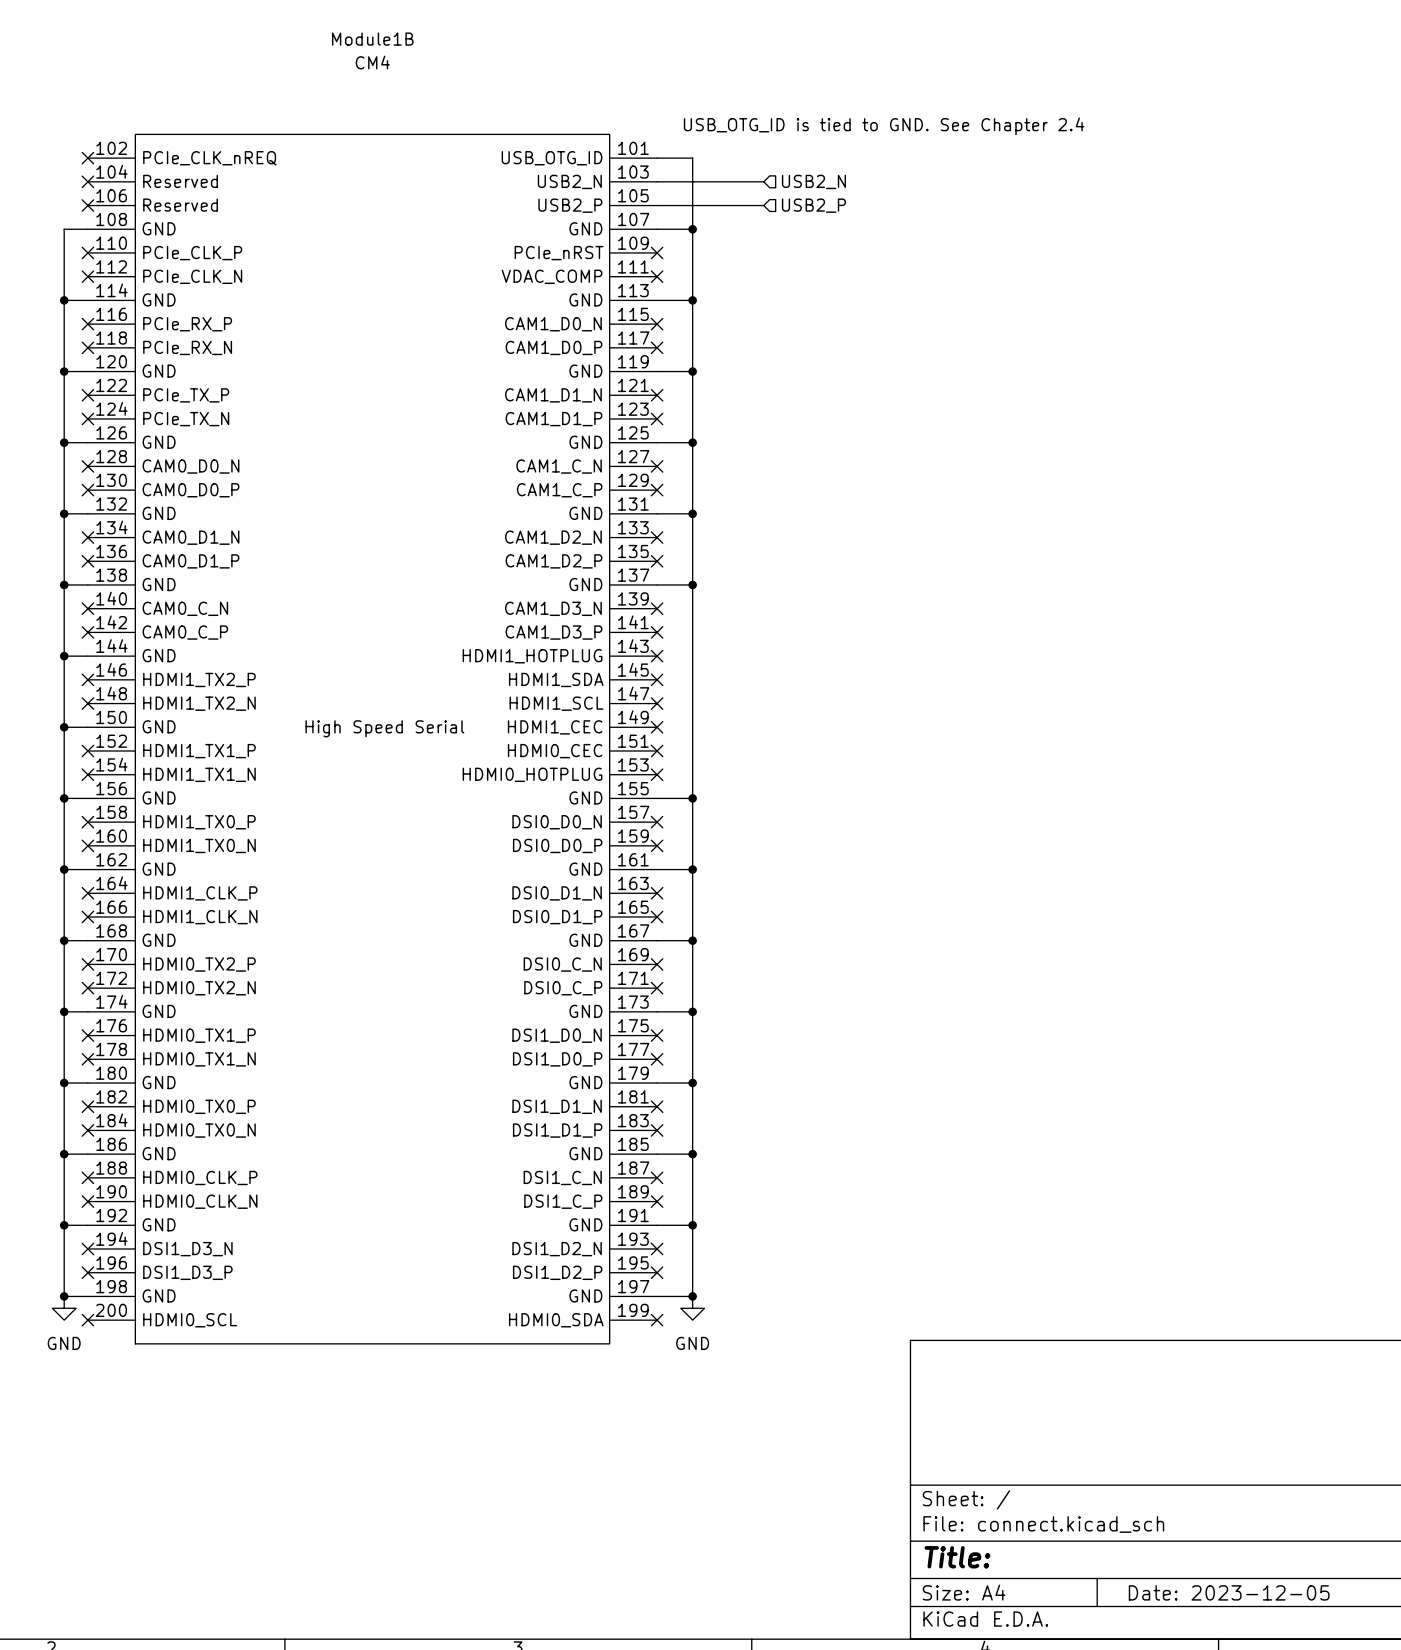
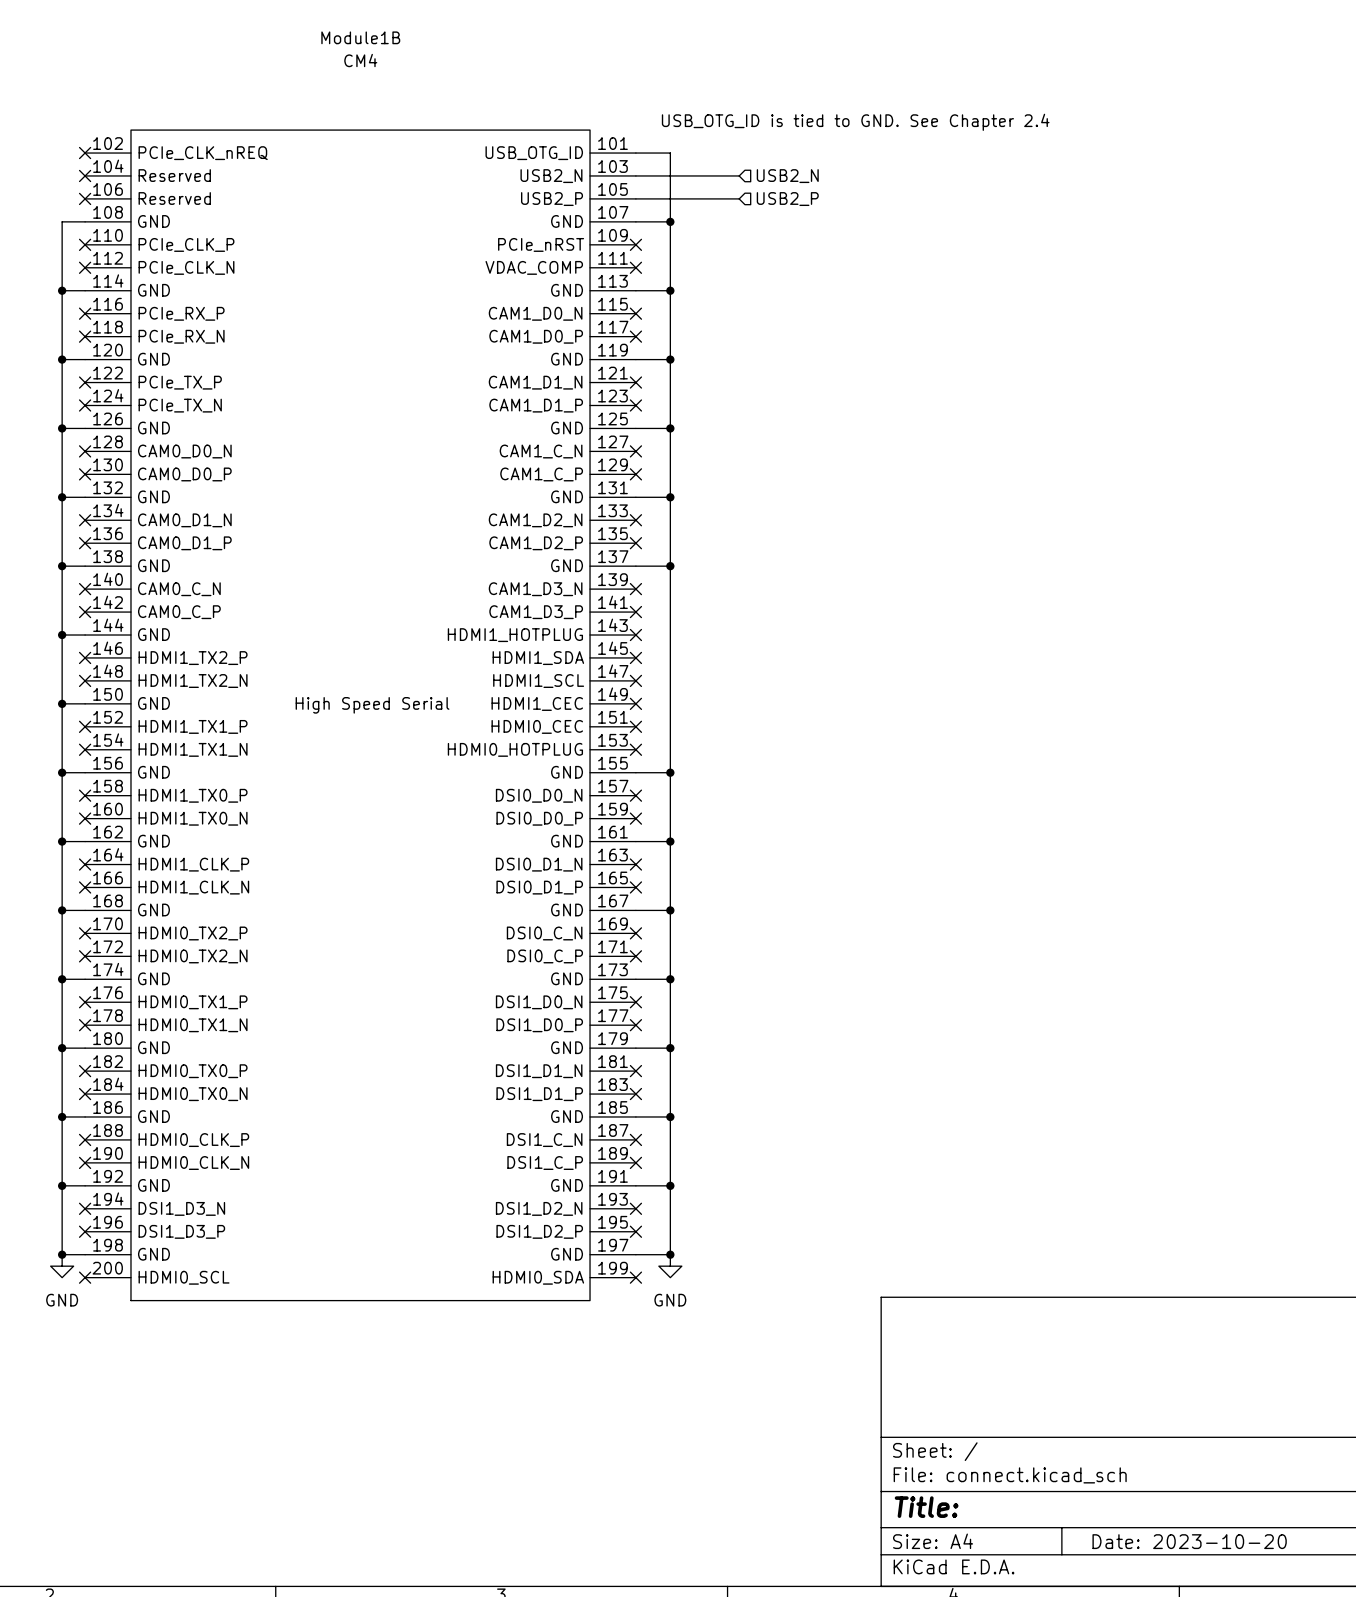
title block: Date: 2023-12-05 (1229, 1592) -> Date: 2023-10-20 (1189, 1541)

